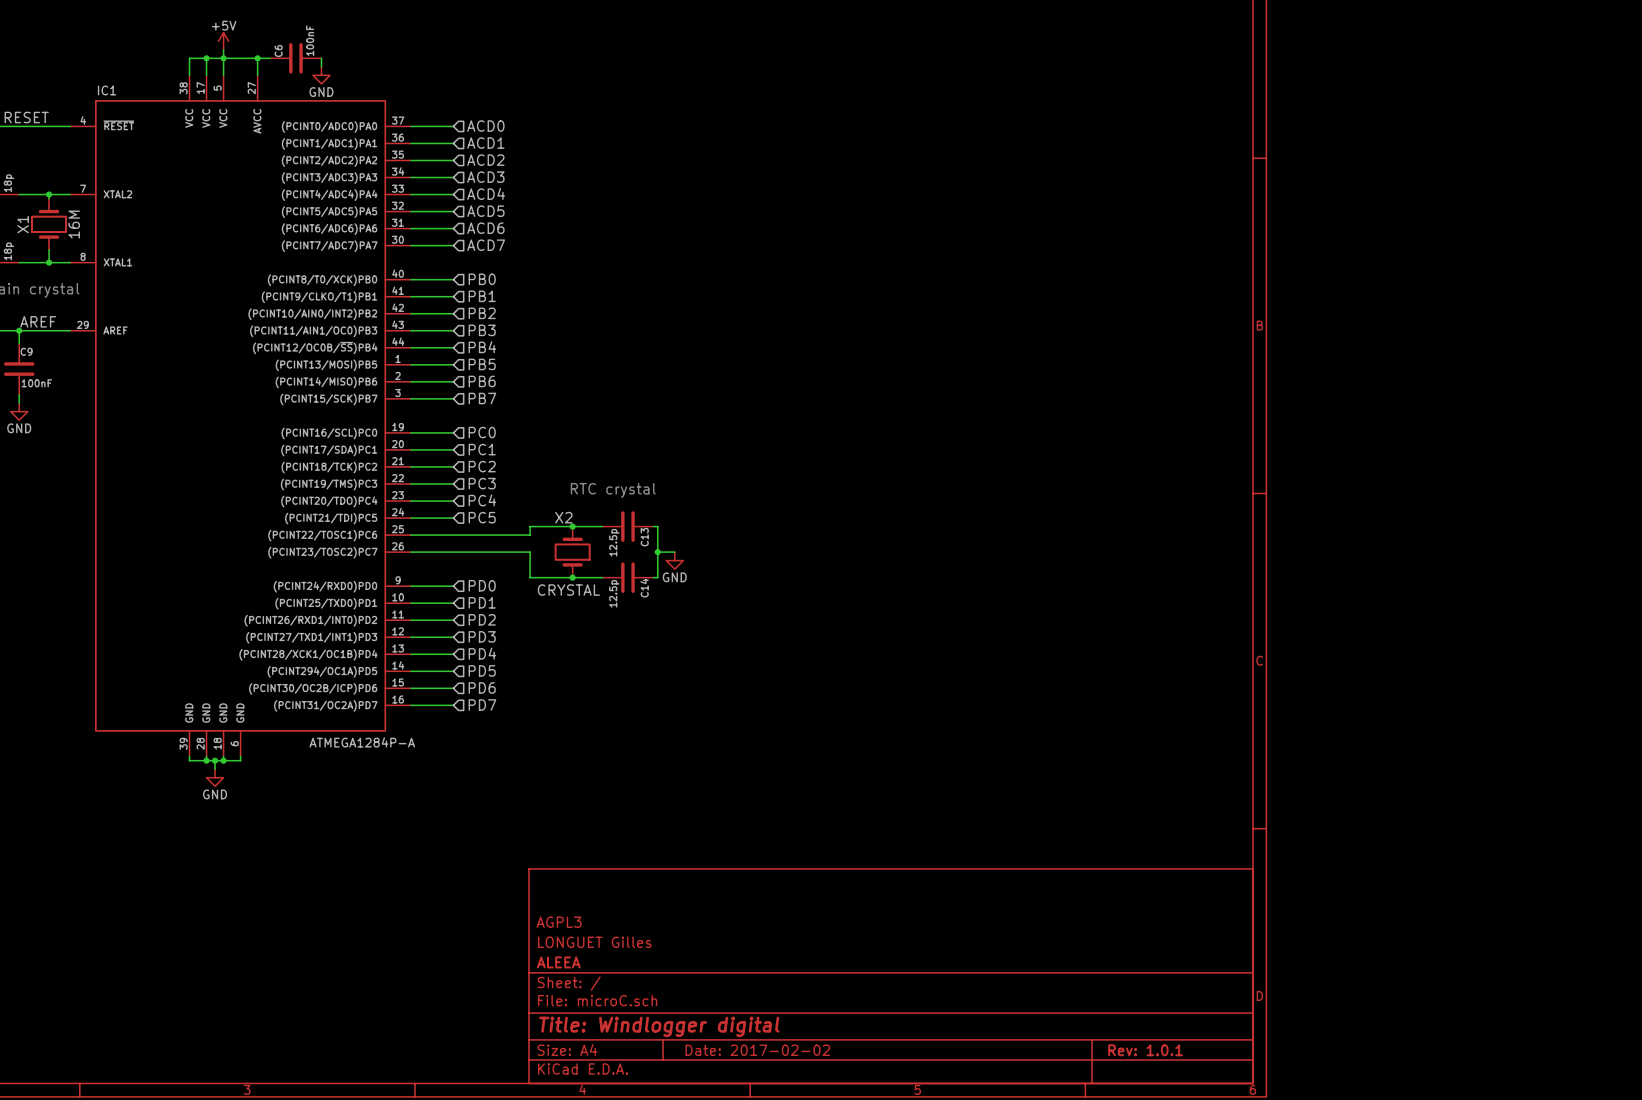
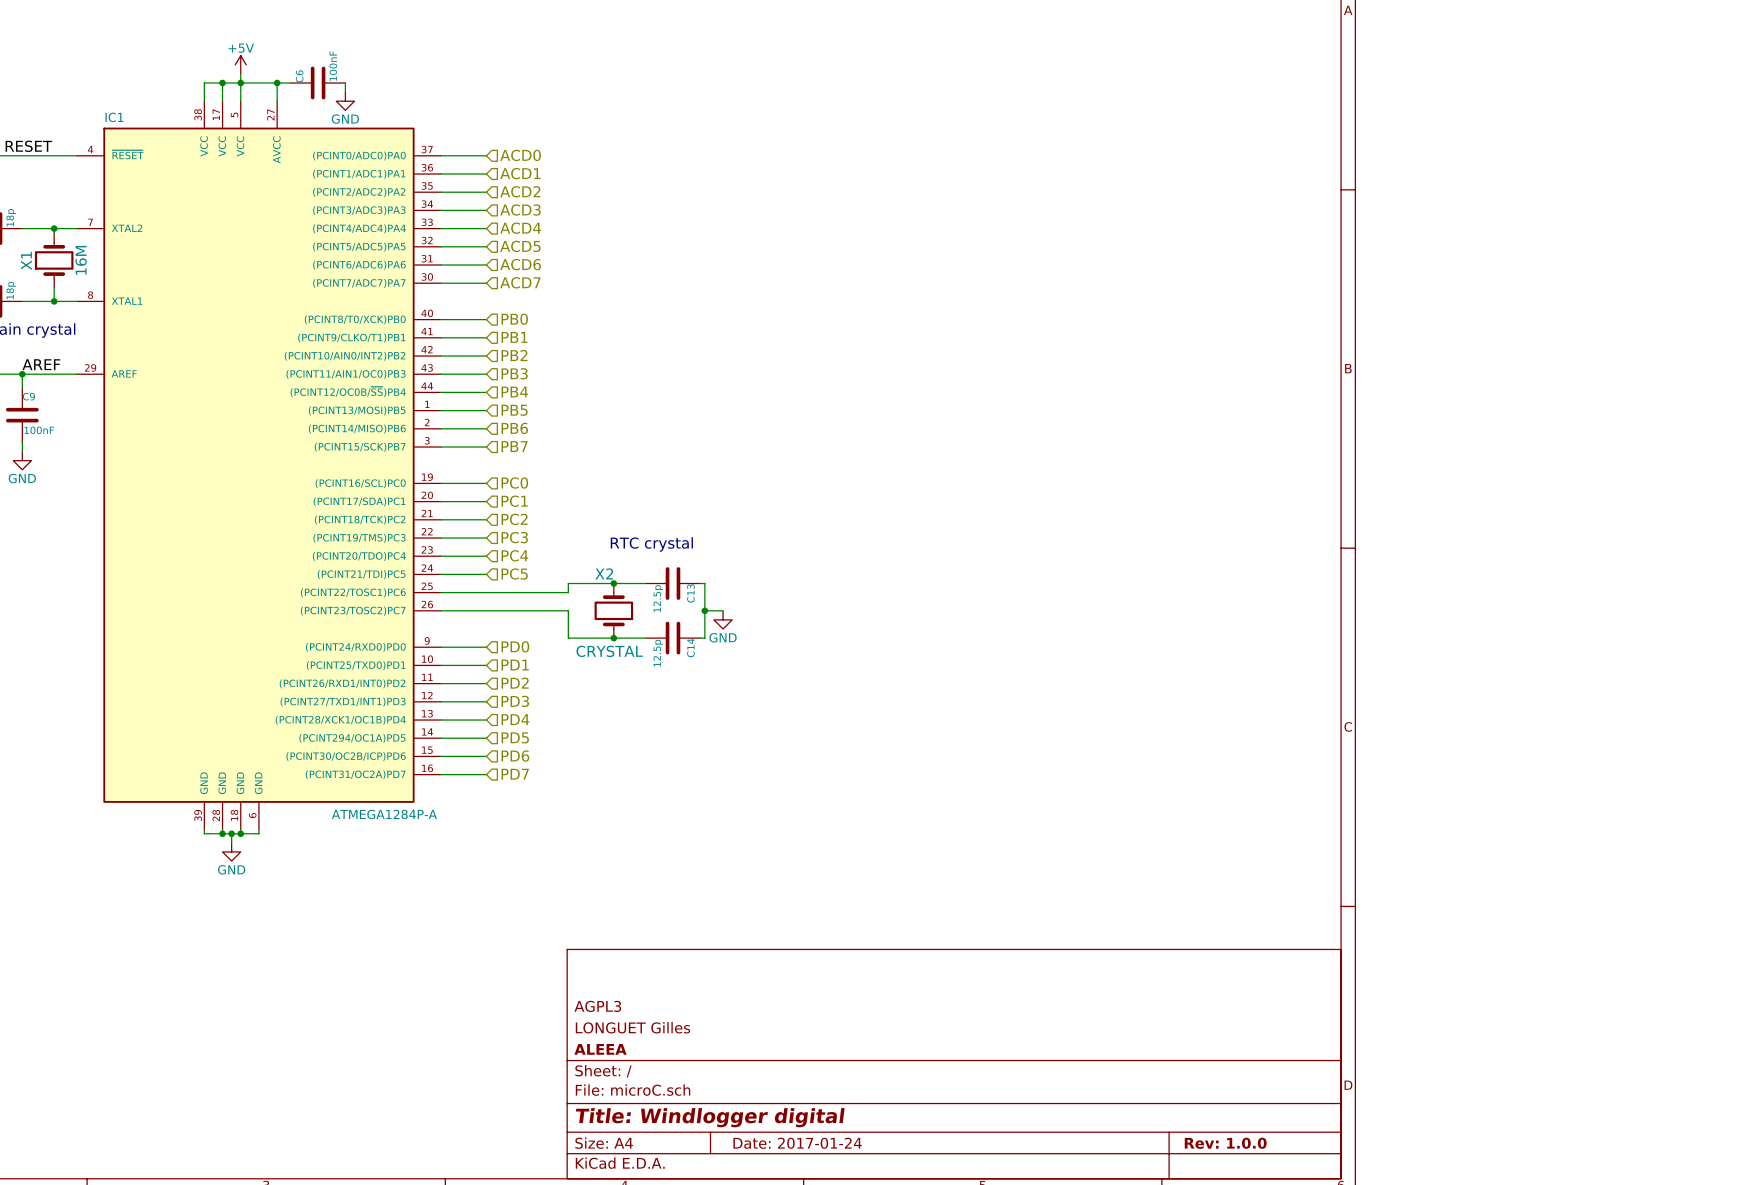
title block: Date: 2017-02-02 (757, 1050) -> Date: 2017-01-24 (797, 1143)
title block: Rev: 1.0.1 (1145, 1050) -> Rev: 1.0.0 (1225, 1143)

